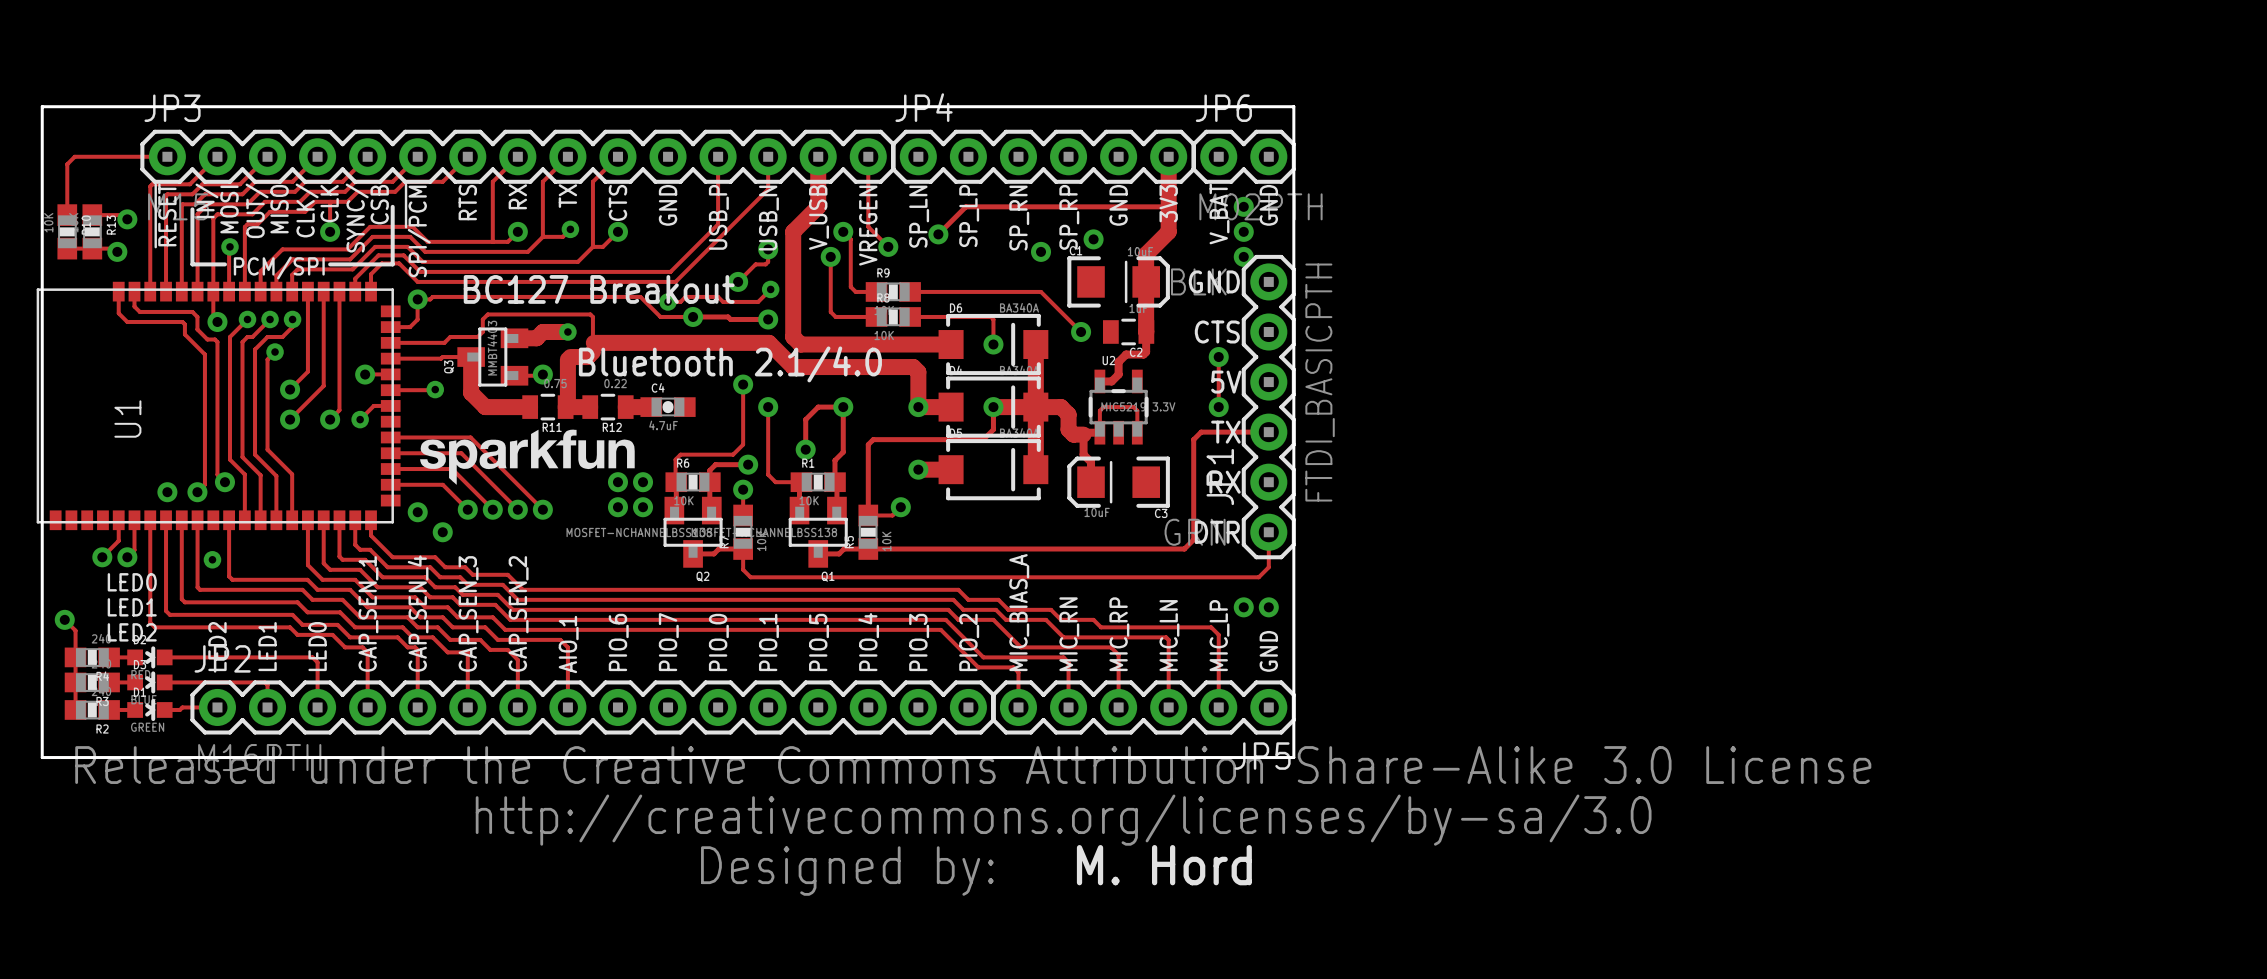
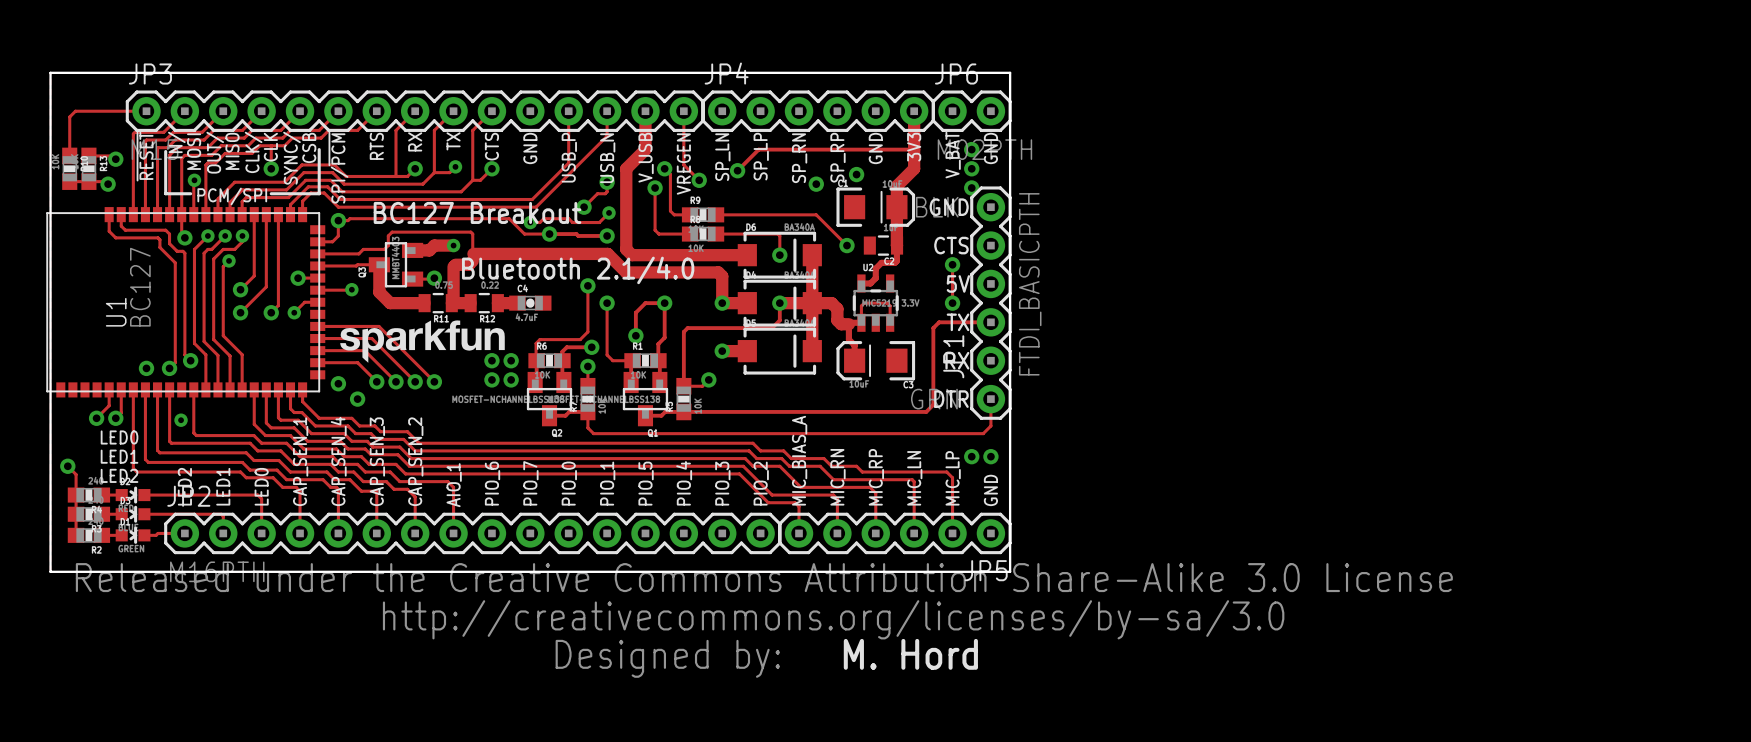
U1 value: none -> BC127 (140, 287)

